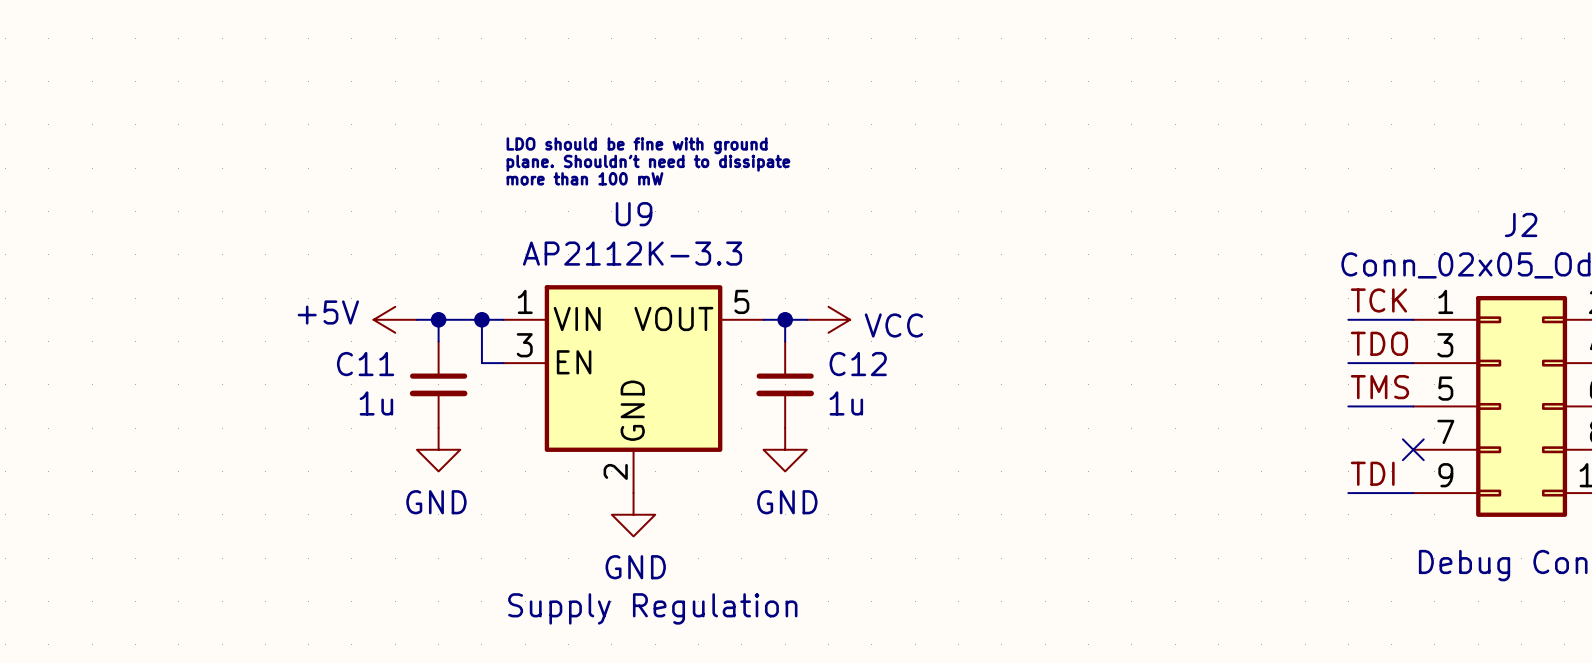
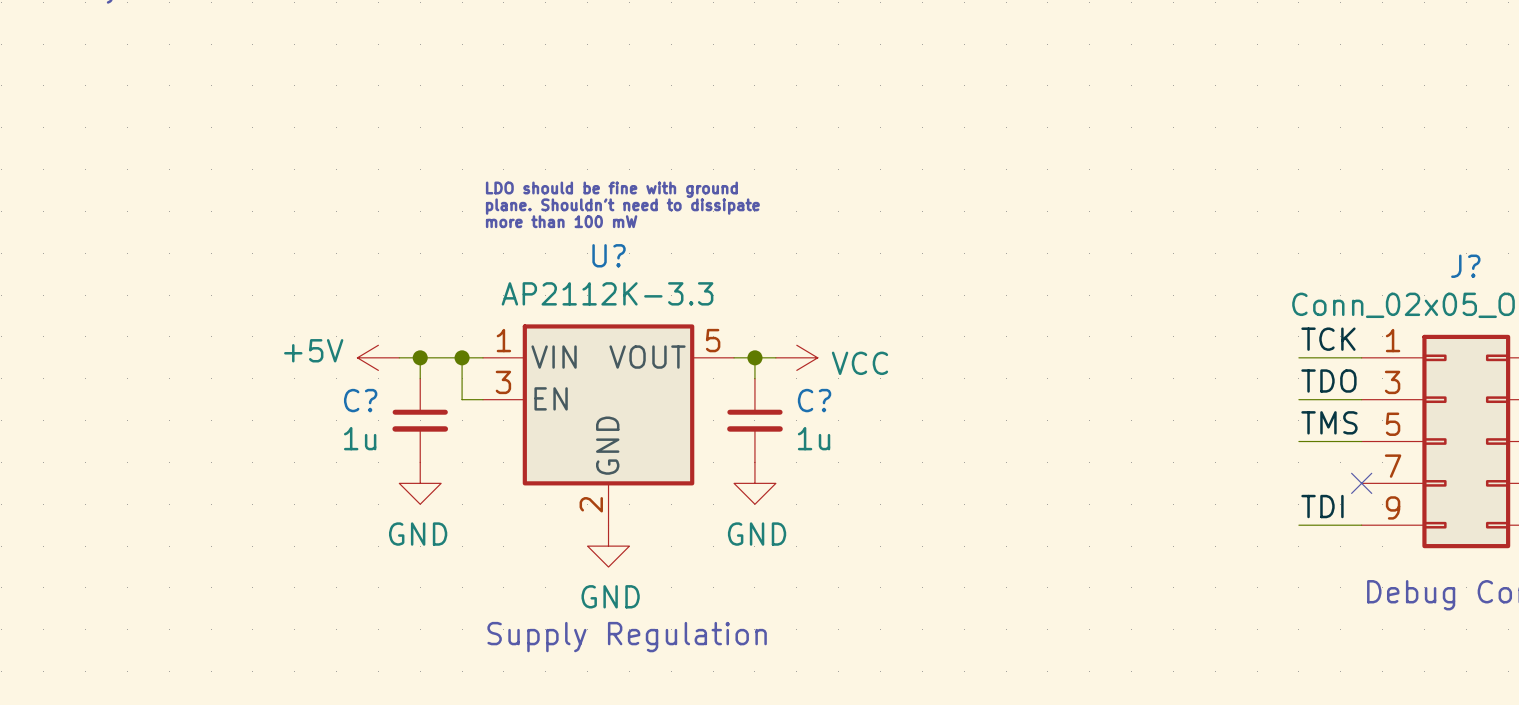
U9 name: U9 (634, 214) -> U? (609, 255)
J2 name: J2 (1521, 224) -> J? (1465, 266)
C11 name: C11 (365, 364) -> C? (360, 400)
C12 name: C12 (858, 364) -> C? (814, 400)

